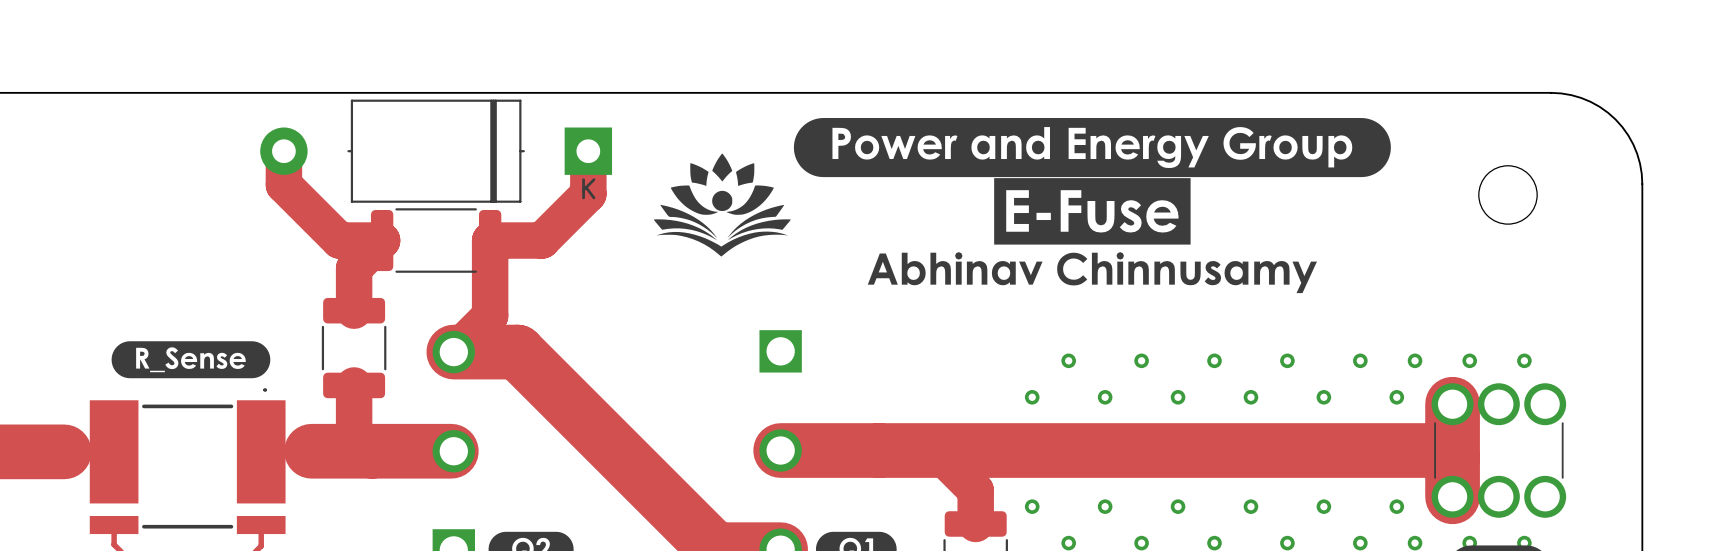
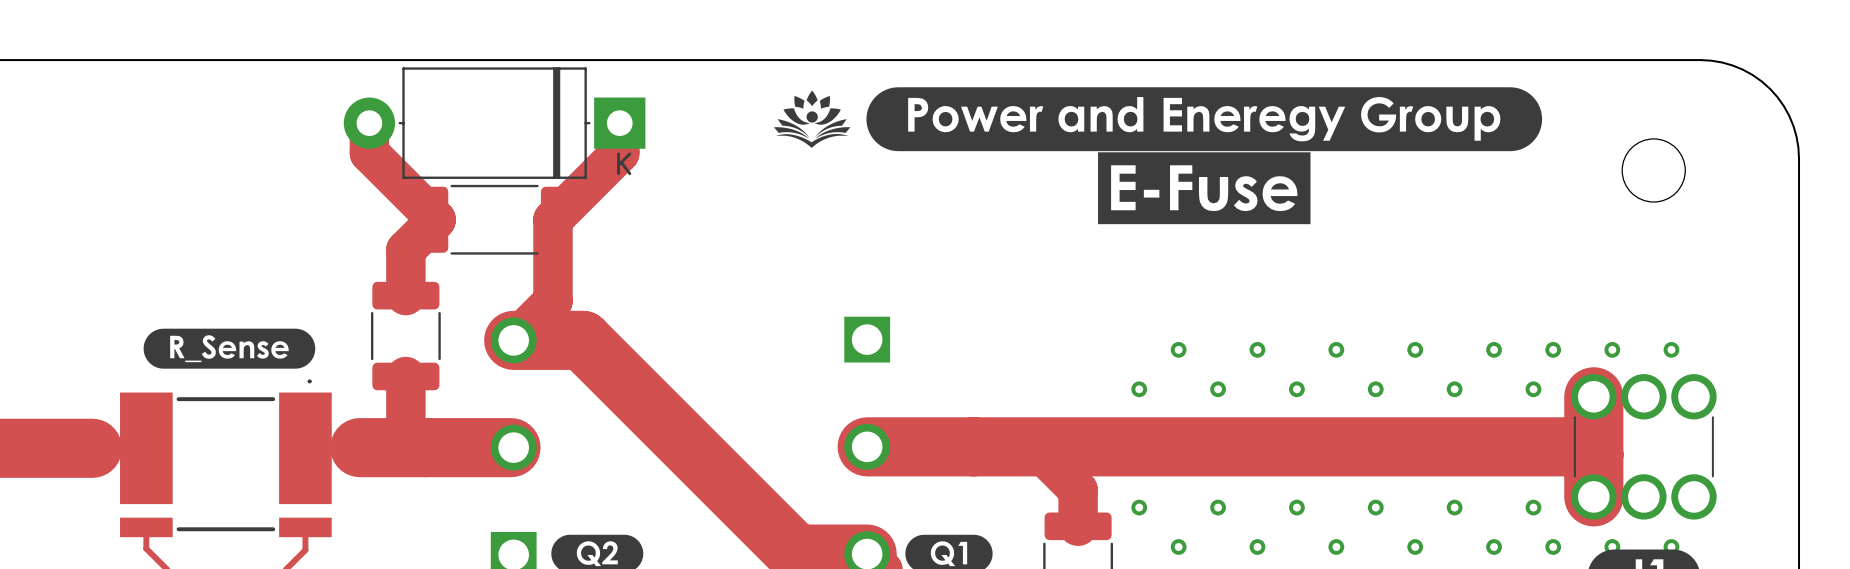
part footprint: [260, 99, 613, 203] -> [343, 67, 646, 179]
drawing shape: [793, 118, 1391, 178] -> [866, 87, 1543, 152]
drawing: none -> [773, 90, 851, 148]
track: (283, 151) (283, 184) (339, 240) (382, 240) -> (369, 123) (369, 152) (436, 219)
track: (588, 151) (588, 194) (541, 240) (490, 240) -> (619, 123) (619, 152) (552, 219)
drawing: [653, 153, 791, 257] -> none
drawing: [867, 252, 1317, 294] -> none

